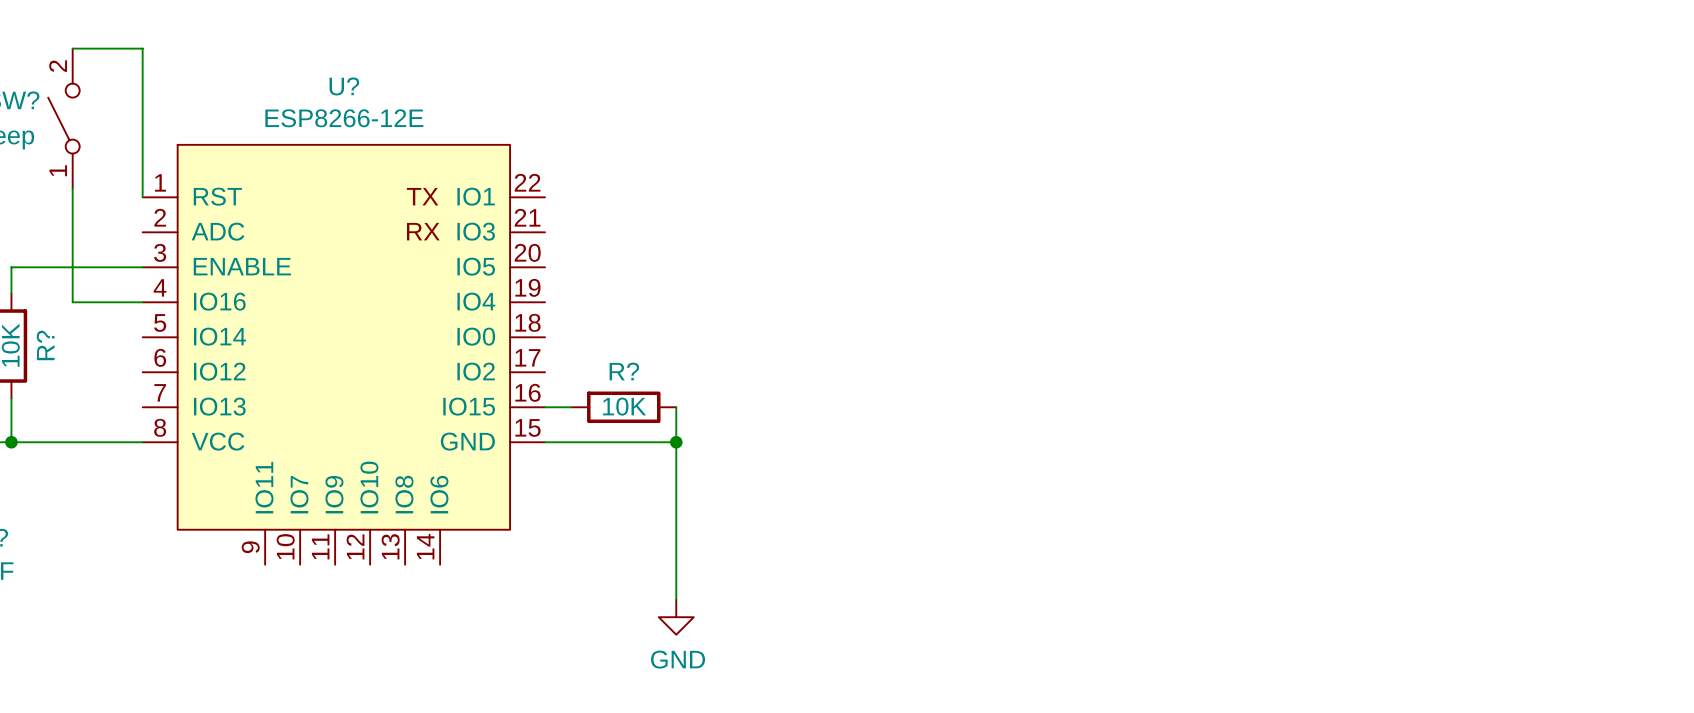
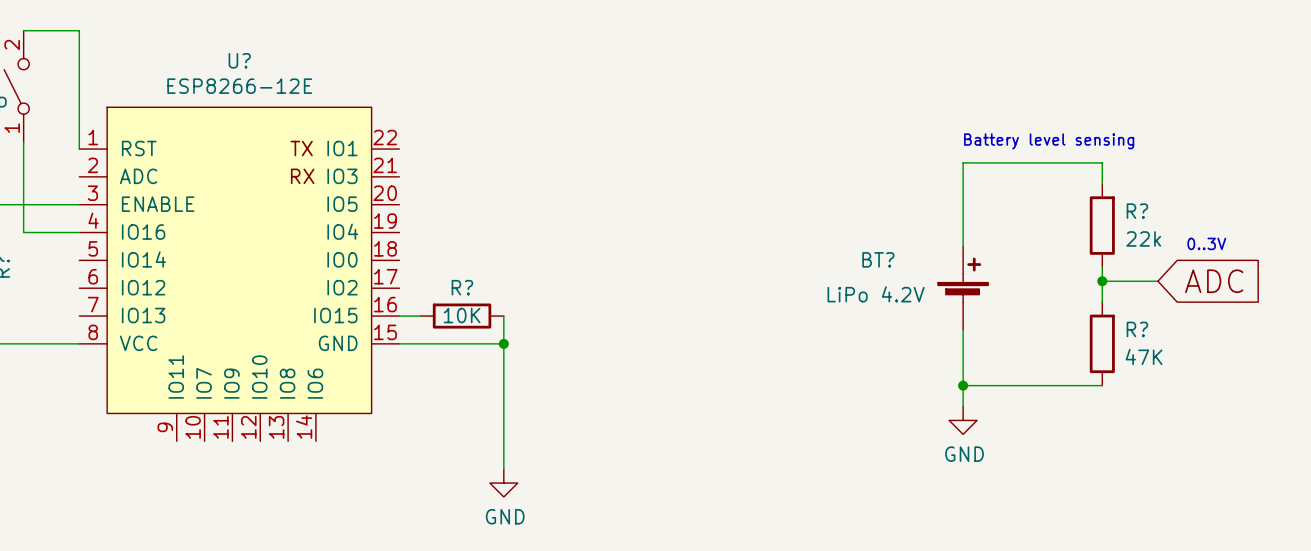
text: none -> Battery level sensing (1049, 141)
wire: none -> (1102, 183) (1102, 162) (963, 162) (963, 246)
R?: none -> 22k (1102, 225)
text: none -> 0..3V (1206, 243)
wire: none -> (1102, 267) (1102, 302)
wire: none -> (1102, 281) (1157, 281)
junction: none -> (1102, 281)
global label: none -> ADC (1214, 281)
BT?: none -> LiPo 4.2V (963, 288)
wire: none -> (963, 329) (963, 406)
R?: none -> 47K (1102, 343)
wire: none -> (963, 385) (1102, 385)
junction: none -> (963, 385)
power symbol: none -> GND (963, 420)

